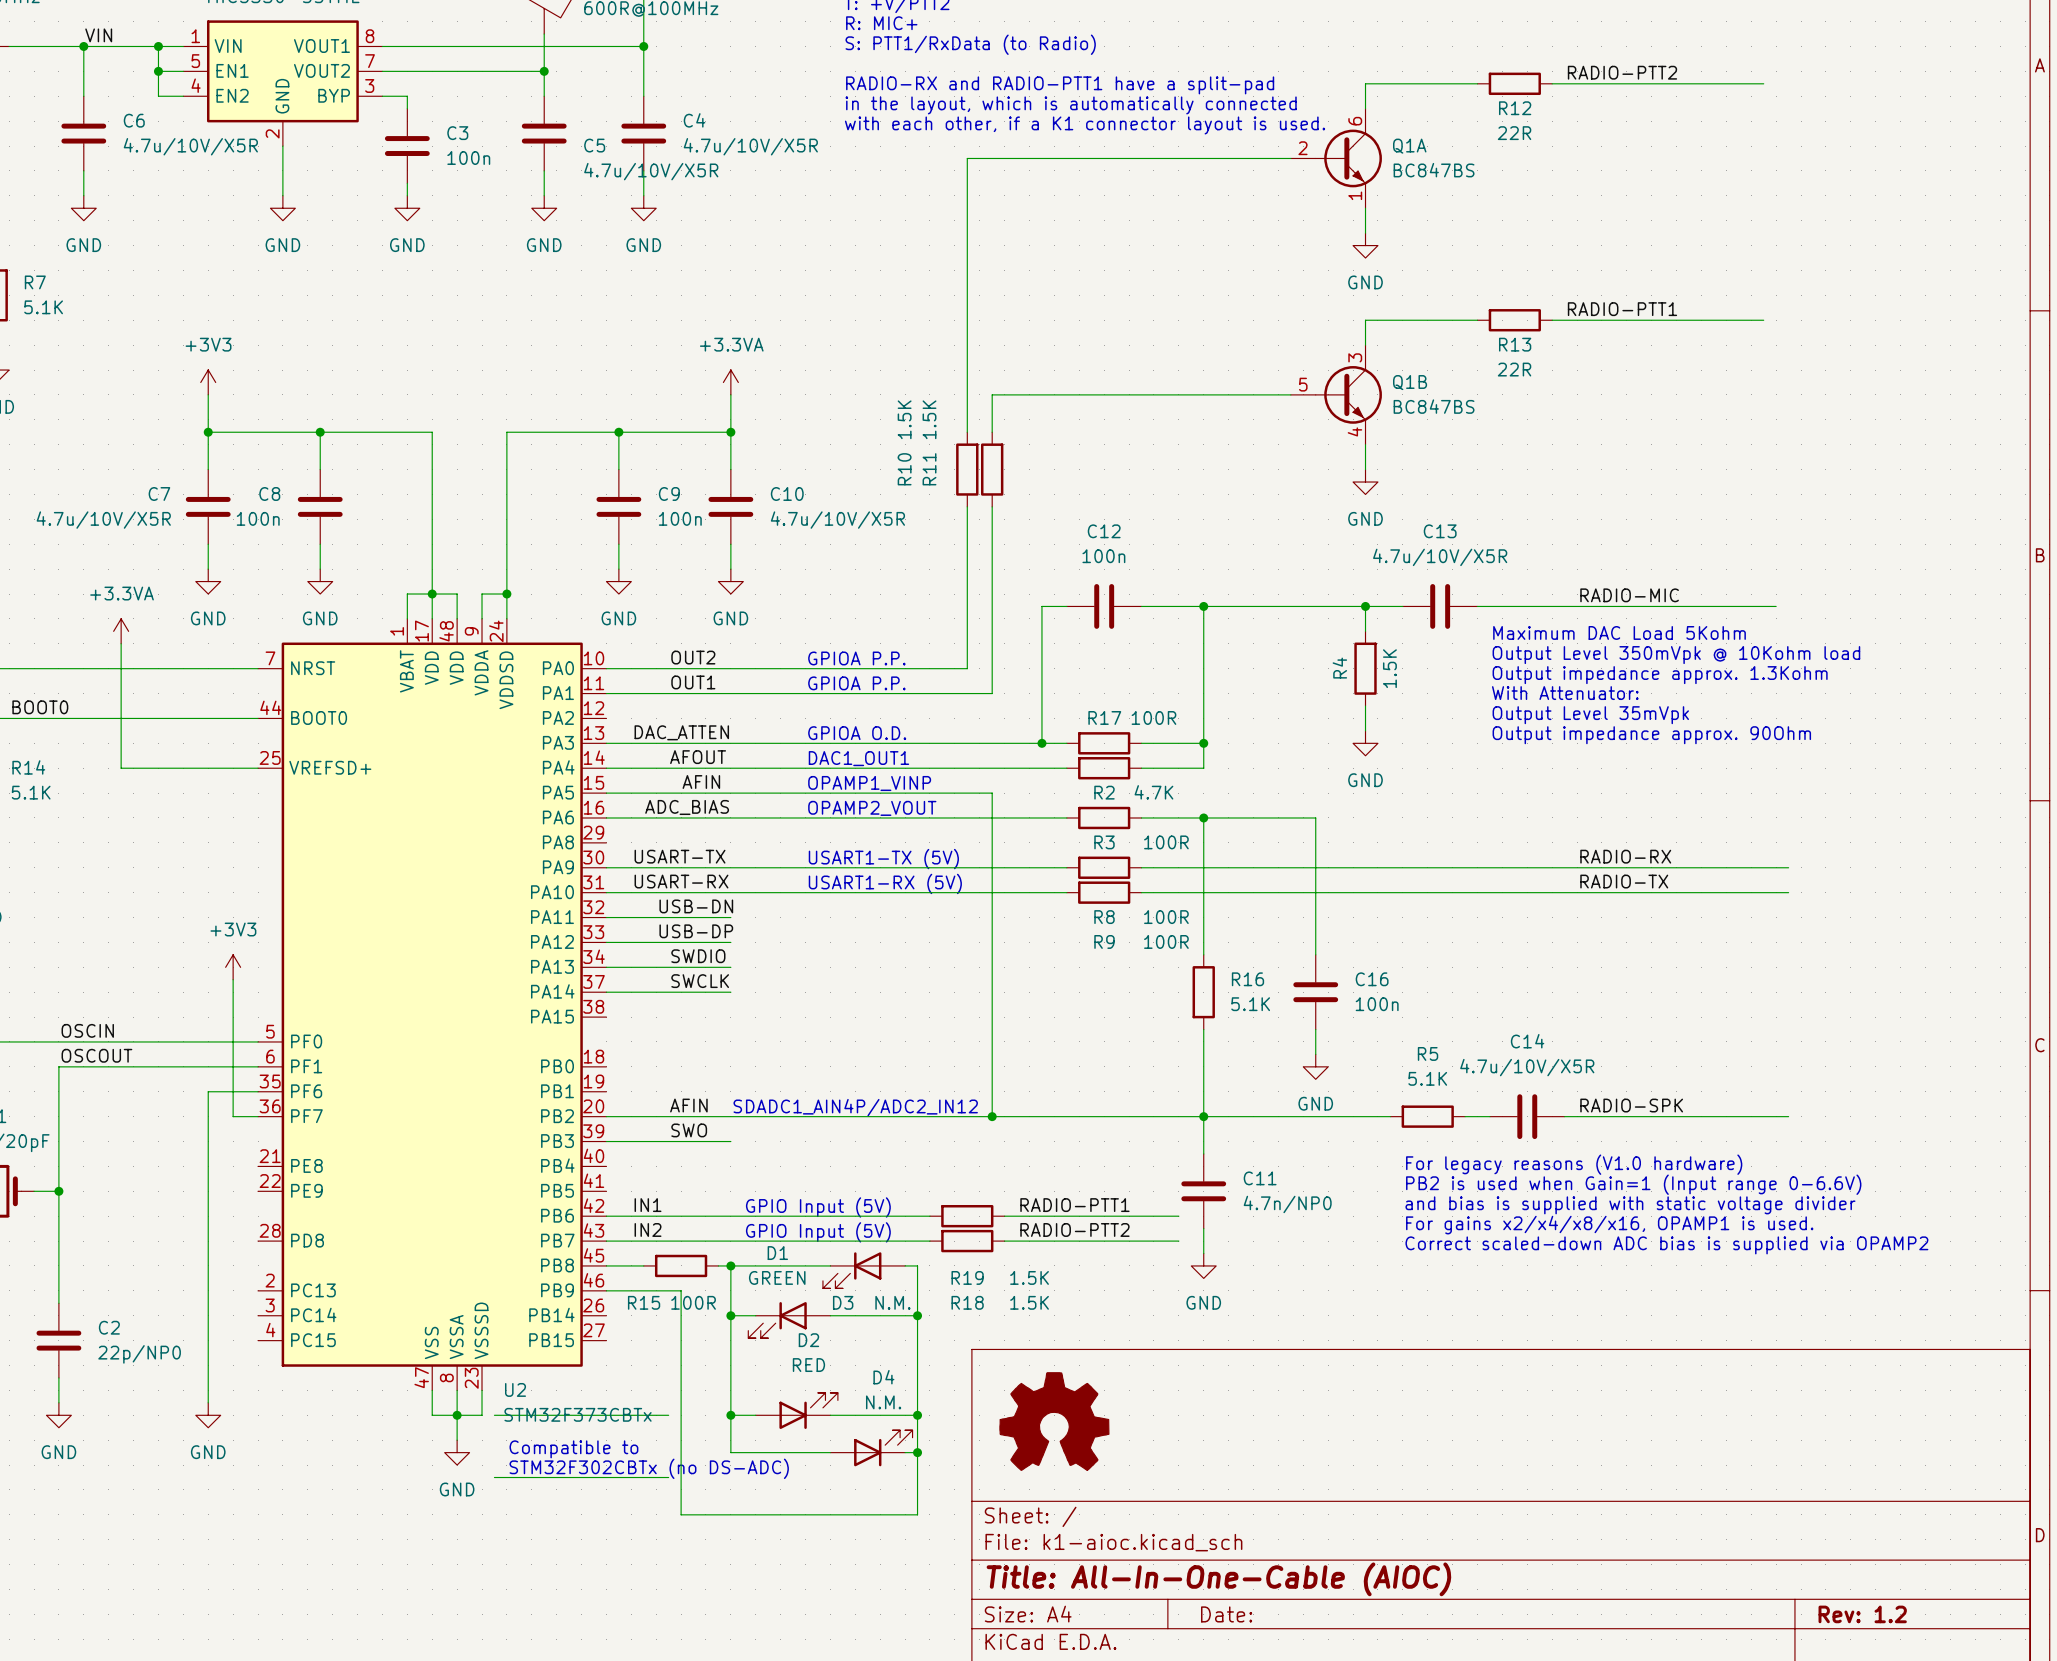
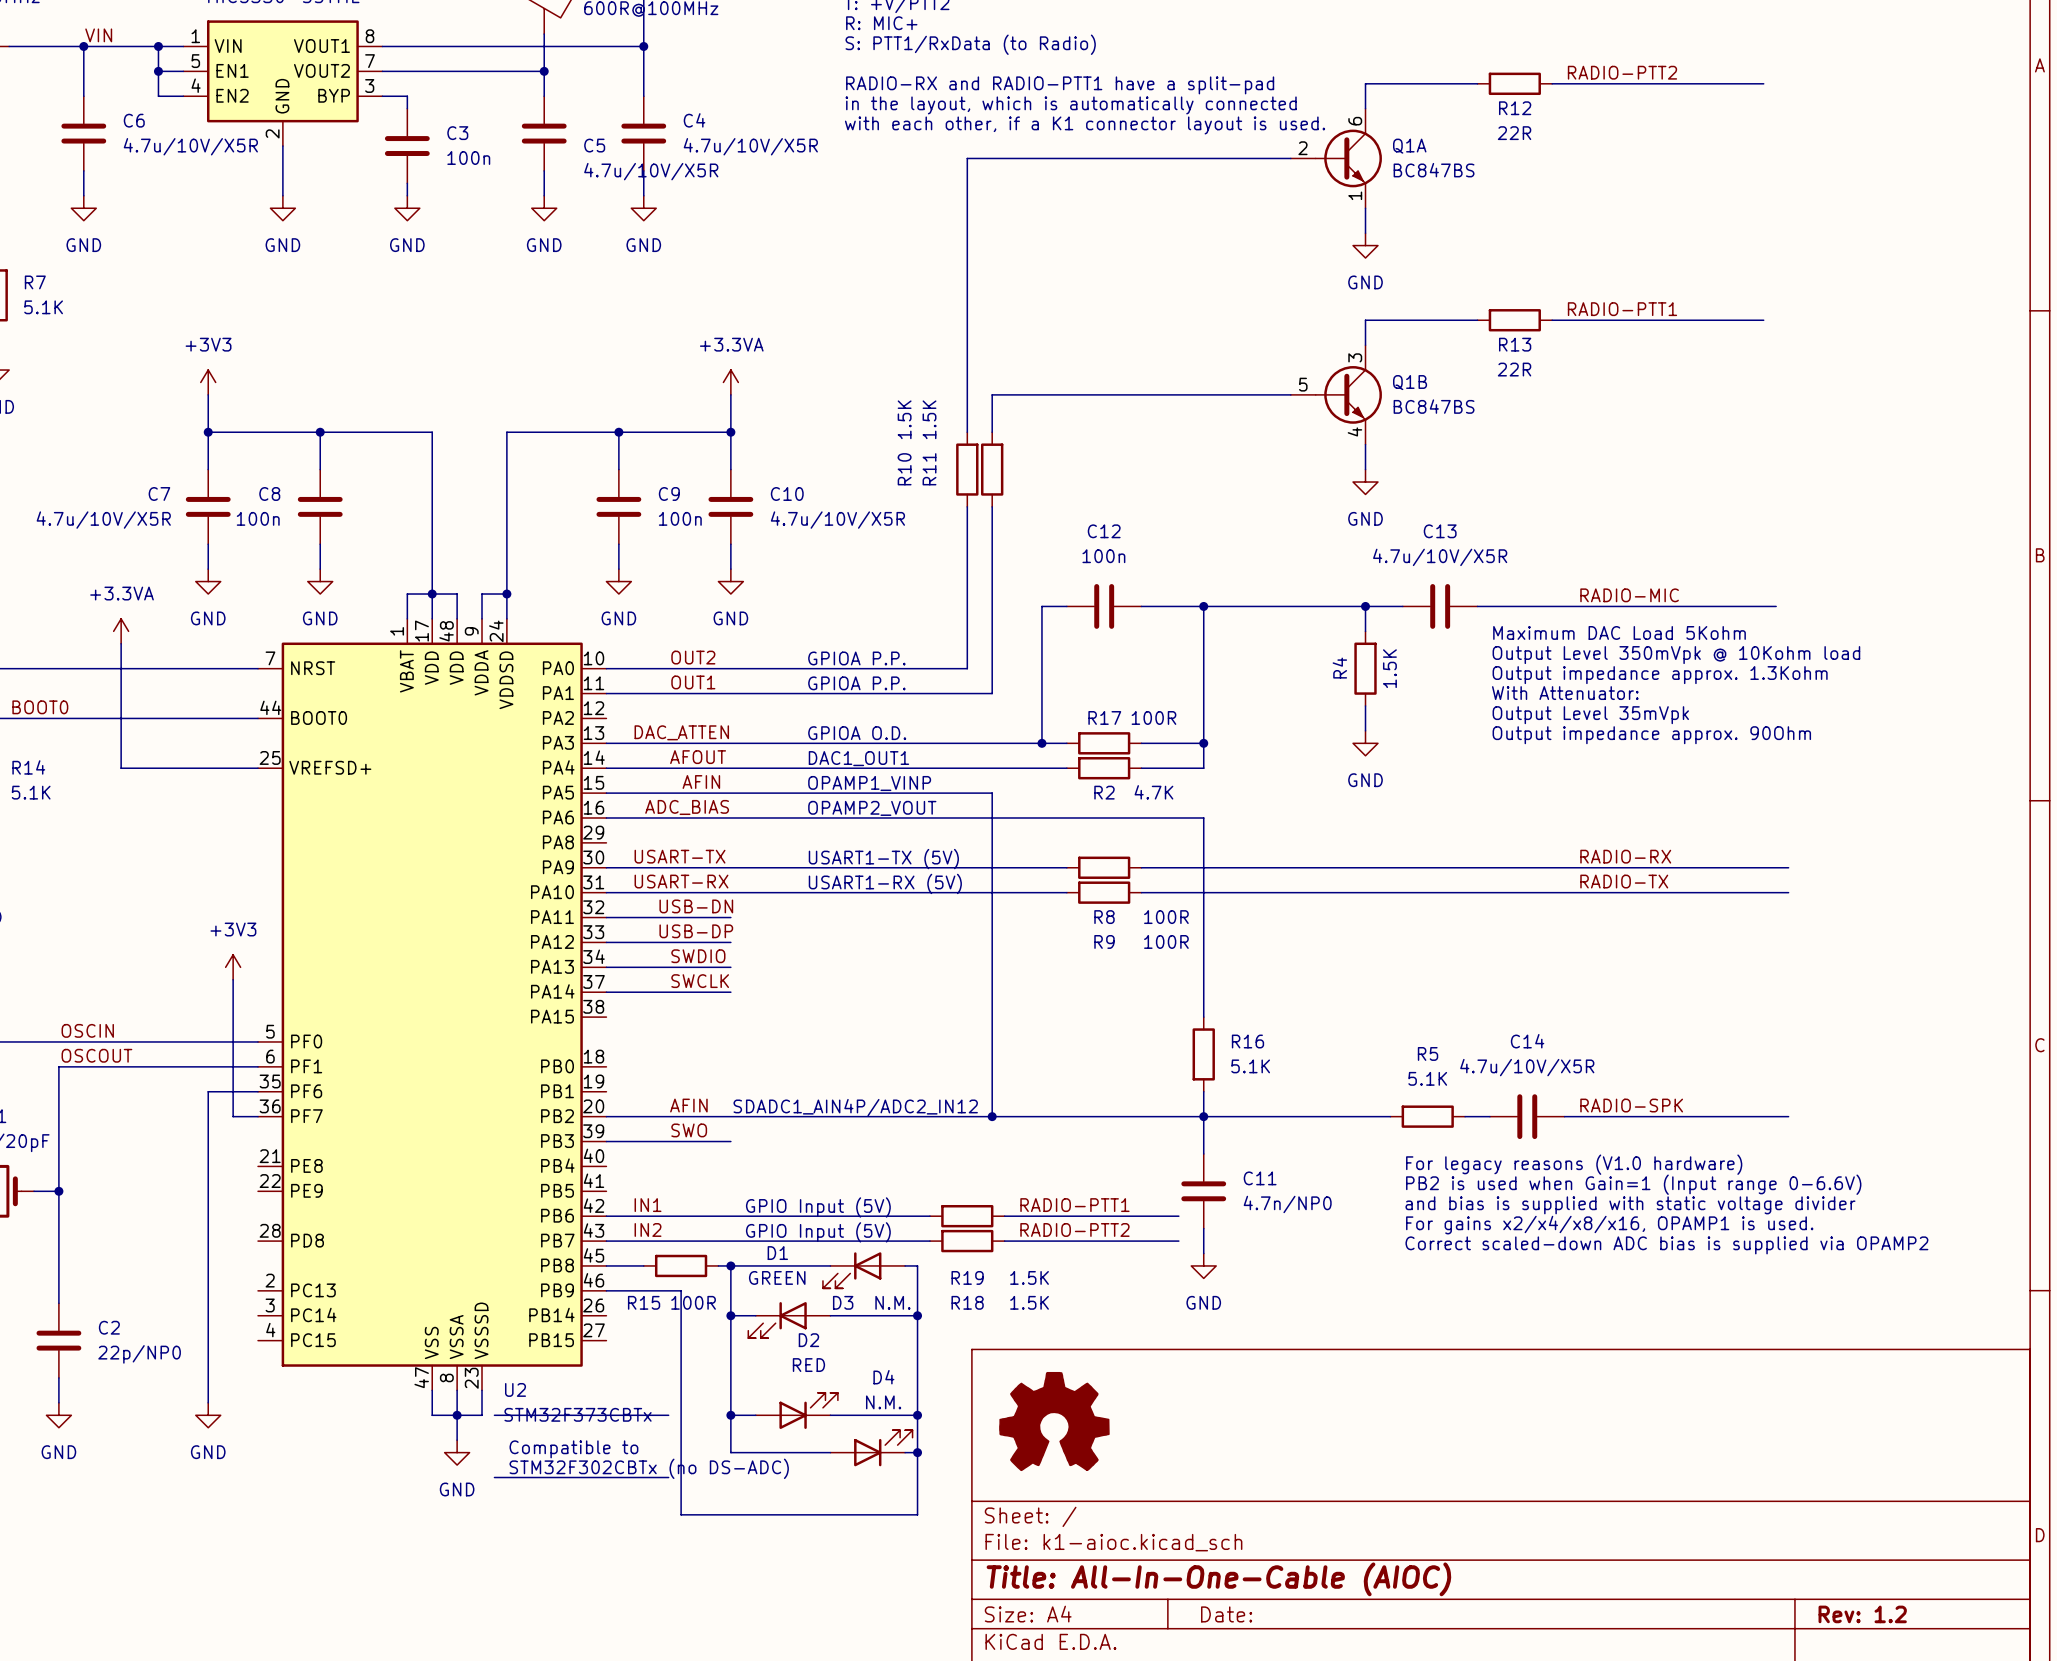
wire: none -> (1066, 817) (1141, 817)
R3: 100R (1104, 817) -> none
wire: (1203, 817) (1315, 817) (1315, 954) -> none
junction: (1203, 817) -> none
R16 position: (1203, 992) -> (1203, 1054)
C16: 100n (1315, 992) -> none
wire: (1203, 1029) (1203, 1091) -> (1203, 954) (1203, 1017)
wire: (1315, 1029) (1315, 1054) -> none
power symbol: GND (1315, 1066) -> none

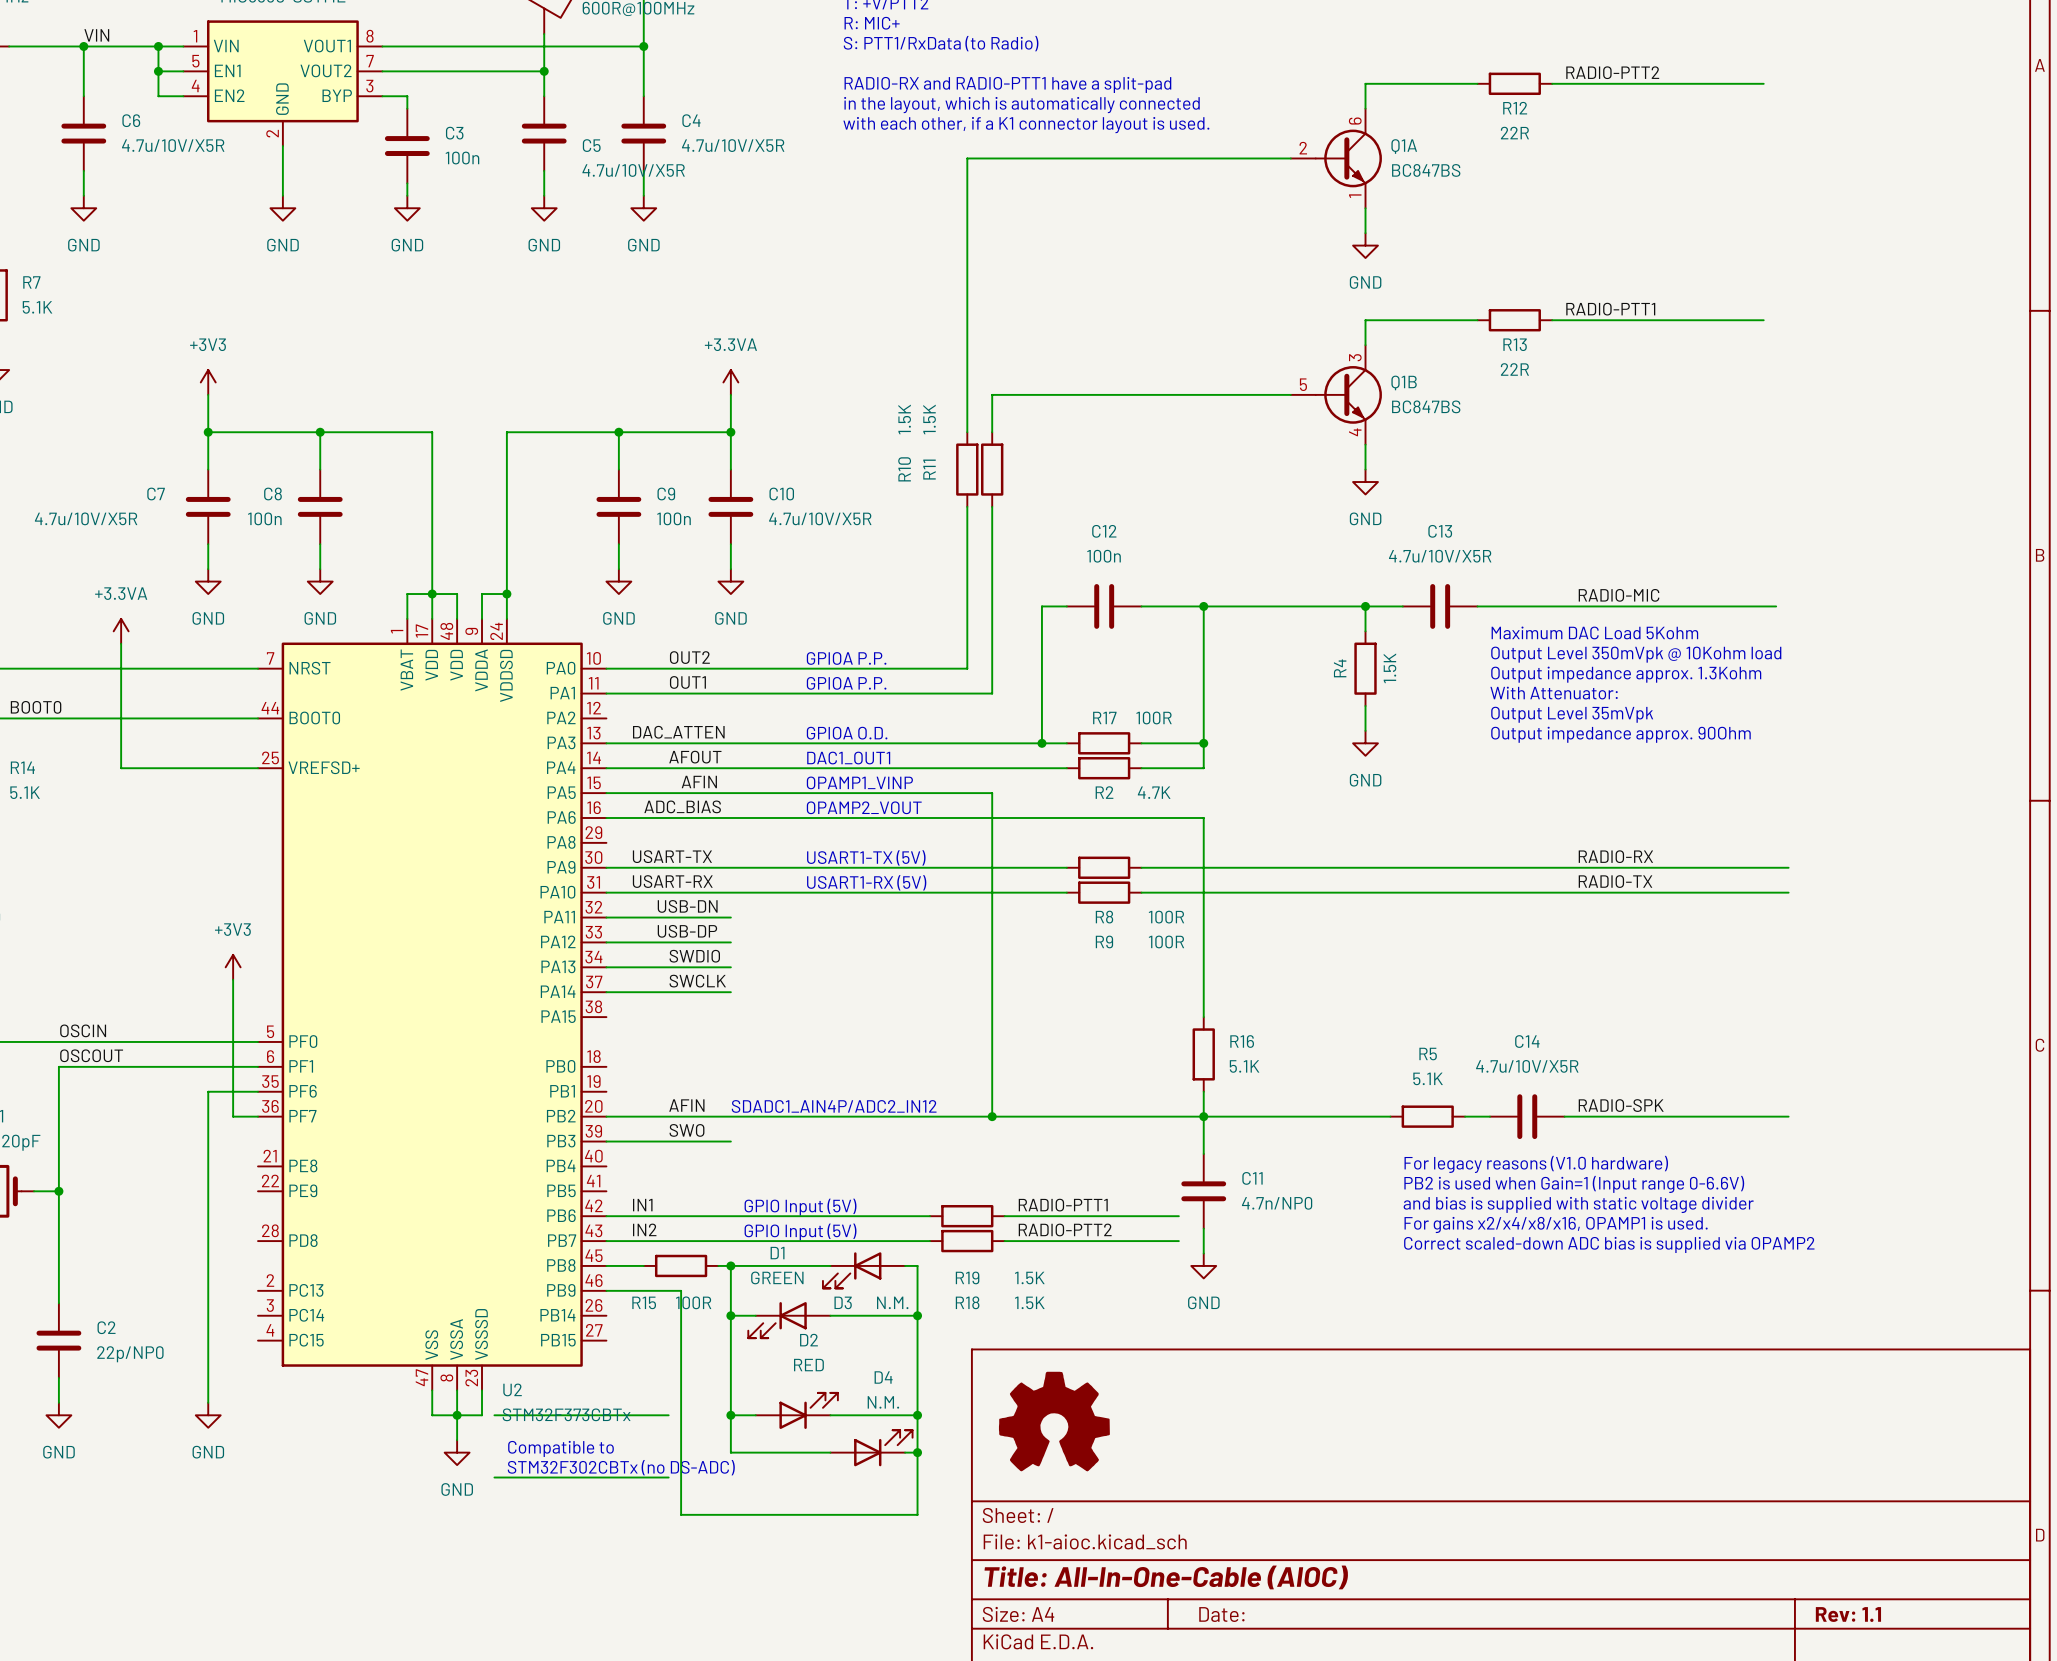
title block: Rev: 1.2 (1862, 1614) -> Rev: 1.1 (1848, 1614)

